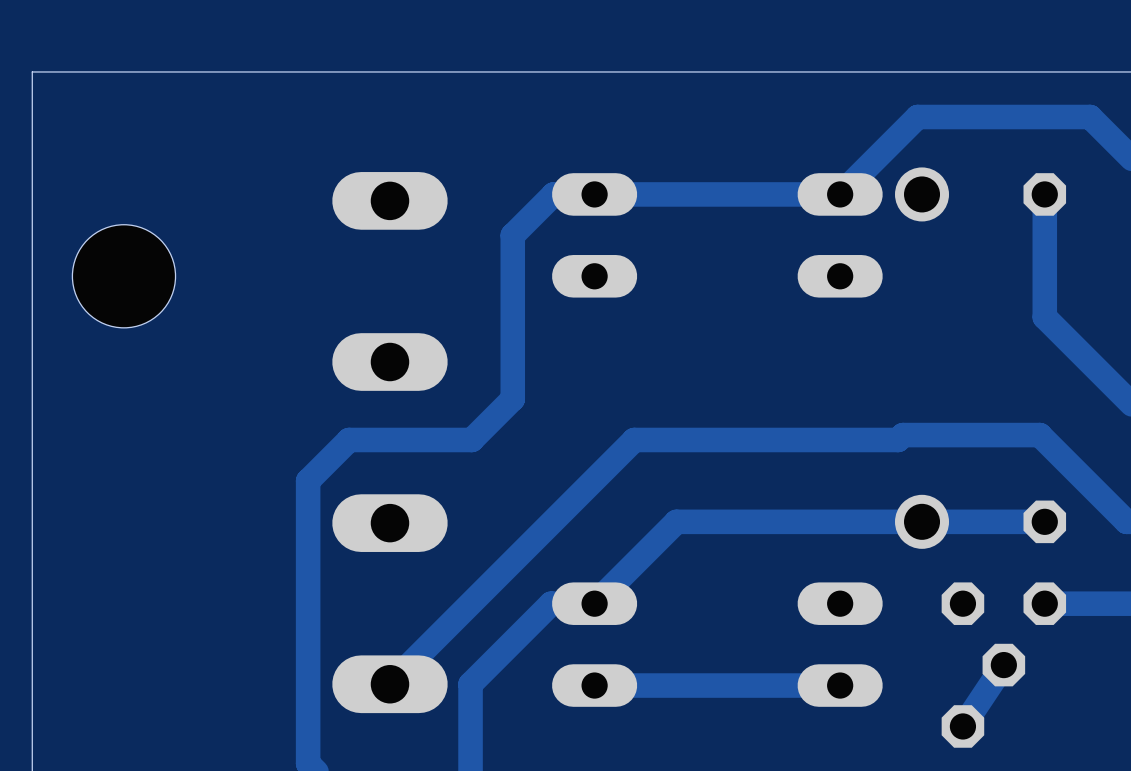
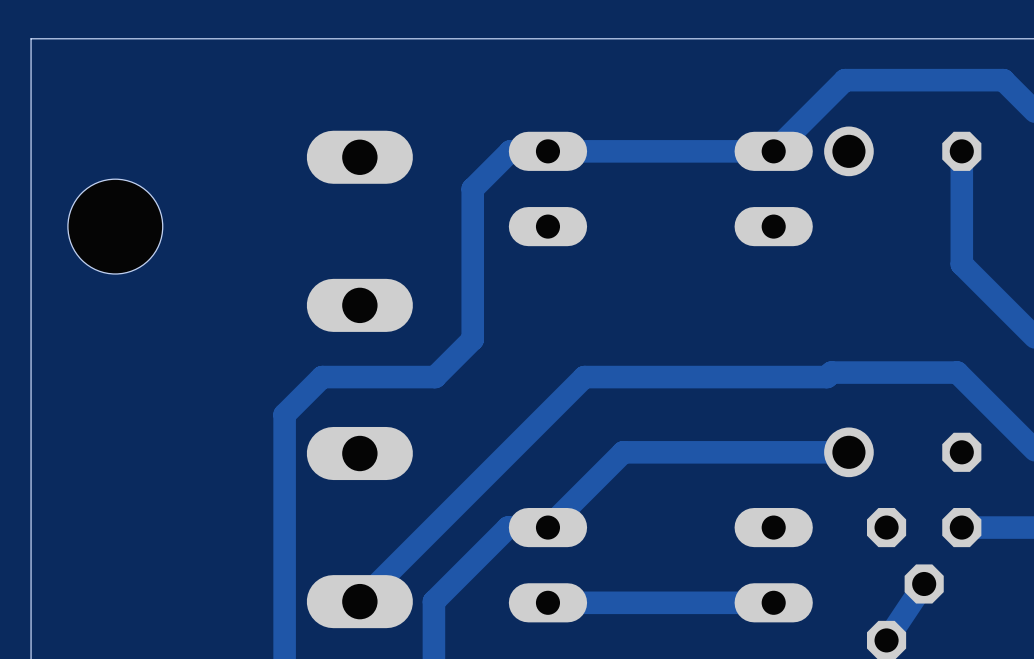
track: (1044, 521) (922, 521) -> none

